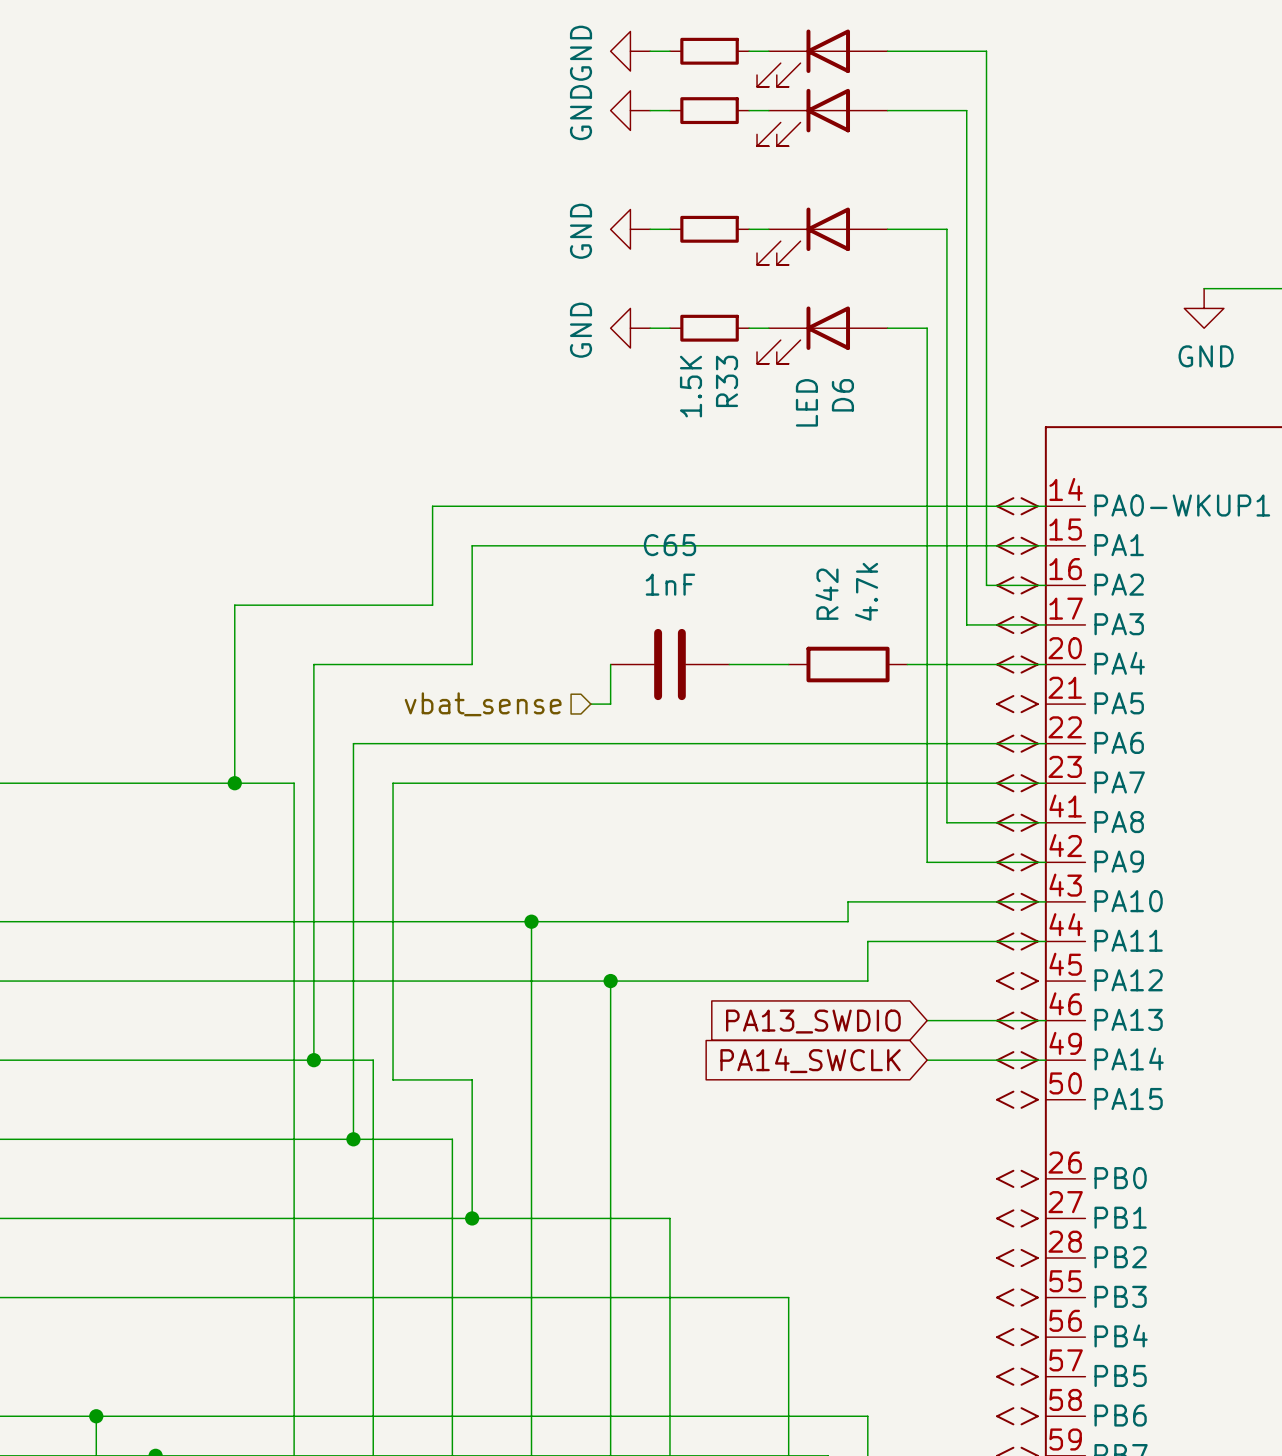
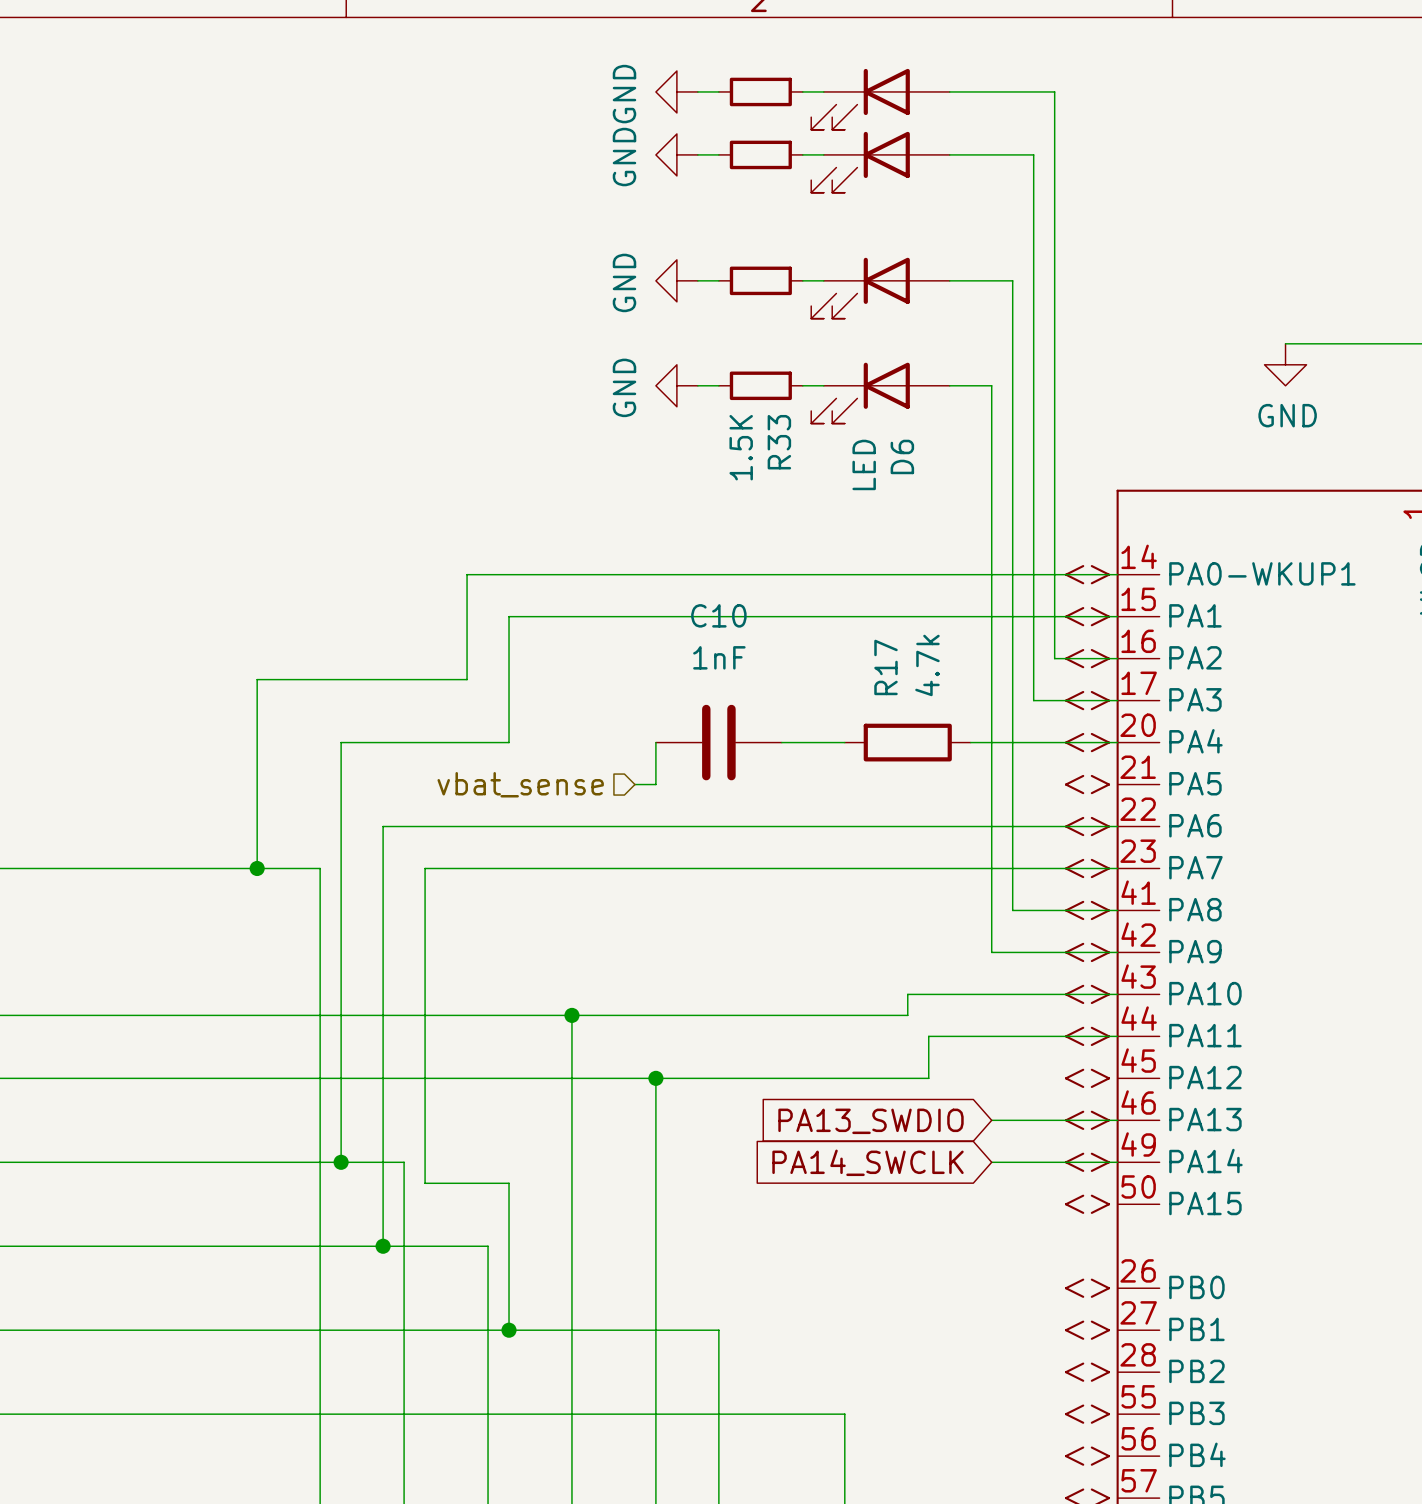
C65 name: C65 (669, 545) -> C10 (718, 615)
R42 name: R42 (827, 594) -> R17 (885, 667)

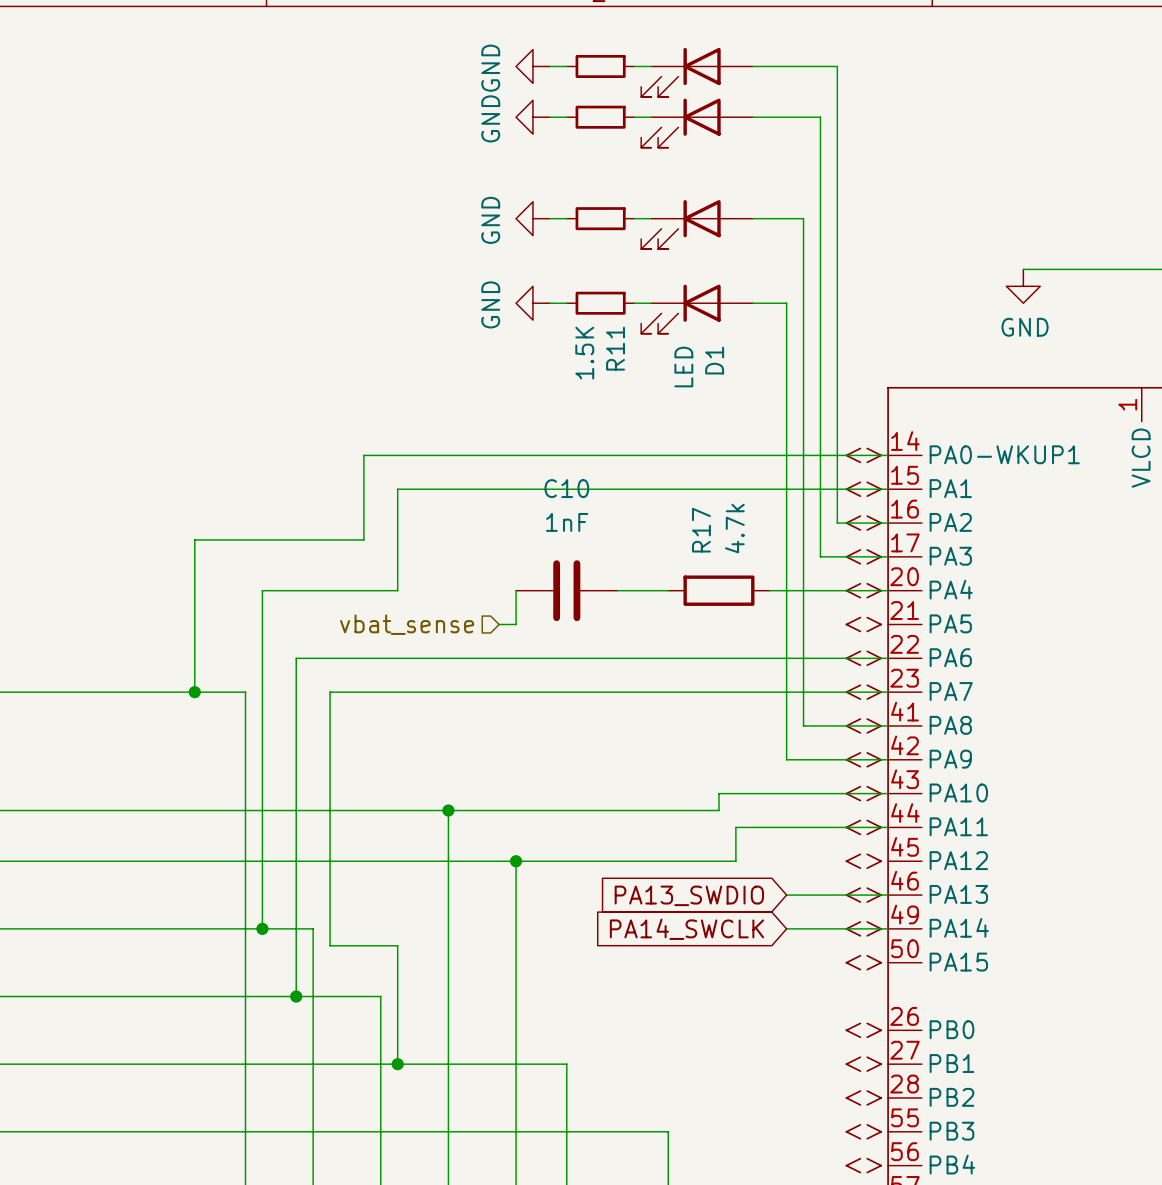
R33 name: R33 (779, 442) -> R11 (615, 348)
D6 name: D6 (902, 456) -> D1 (714, 360)

